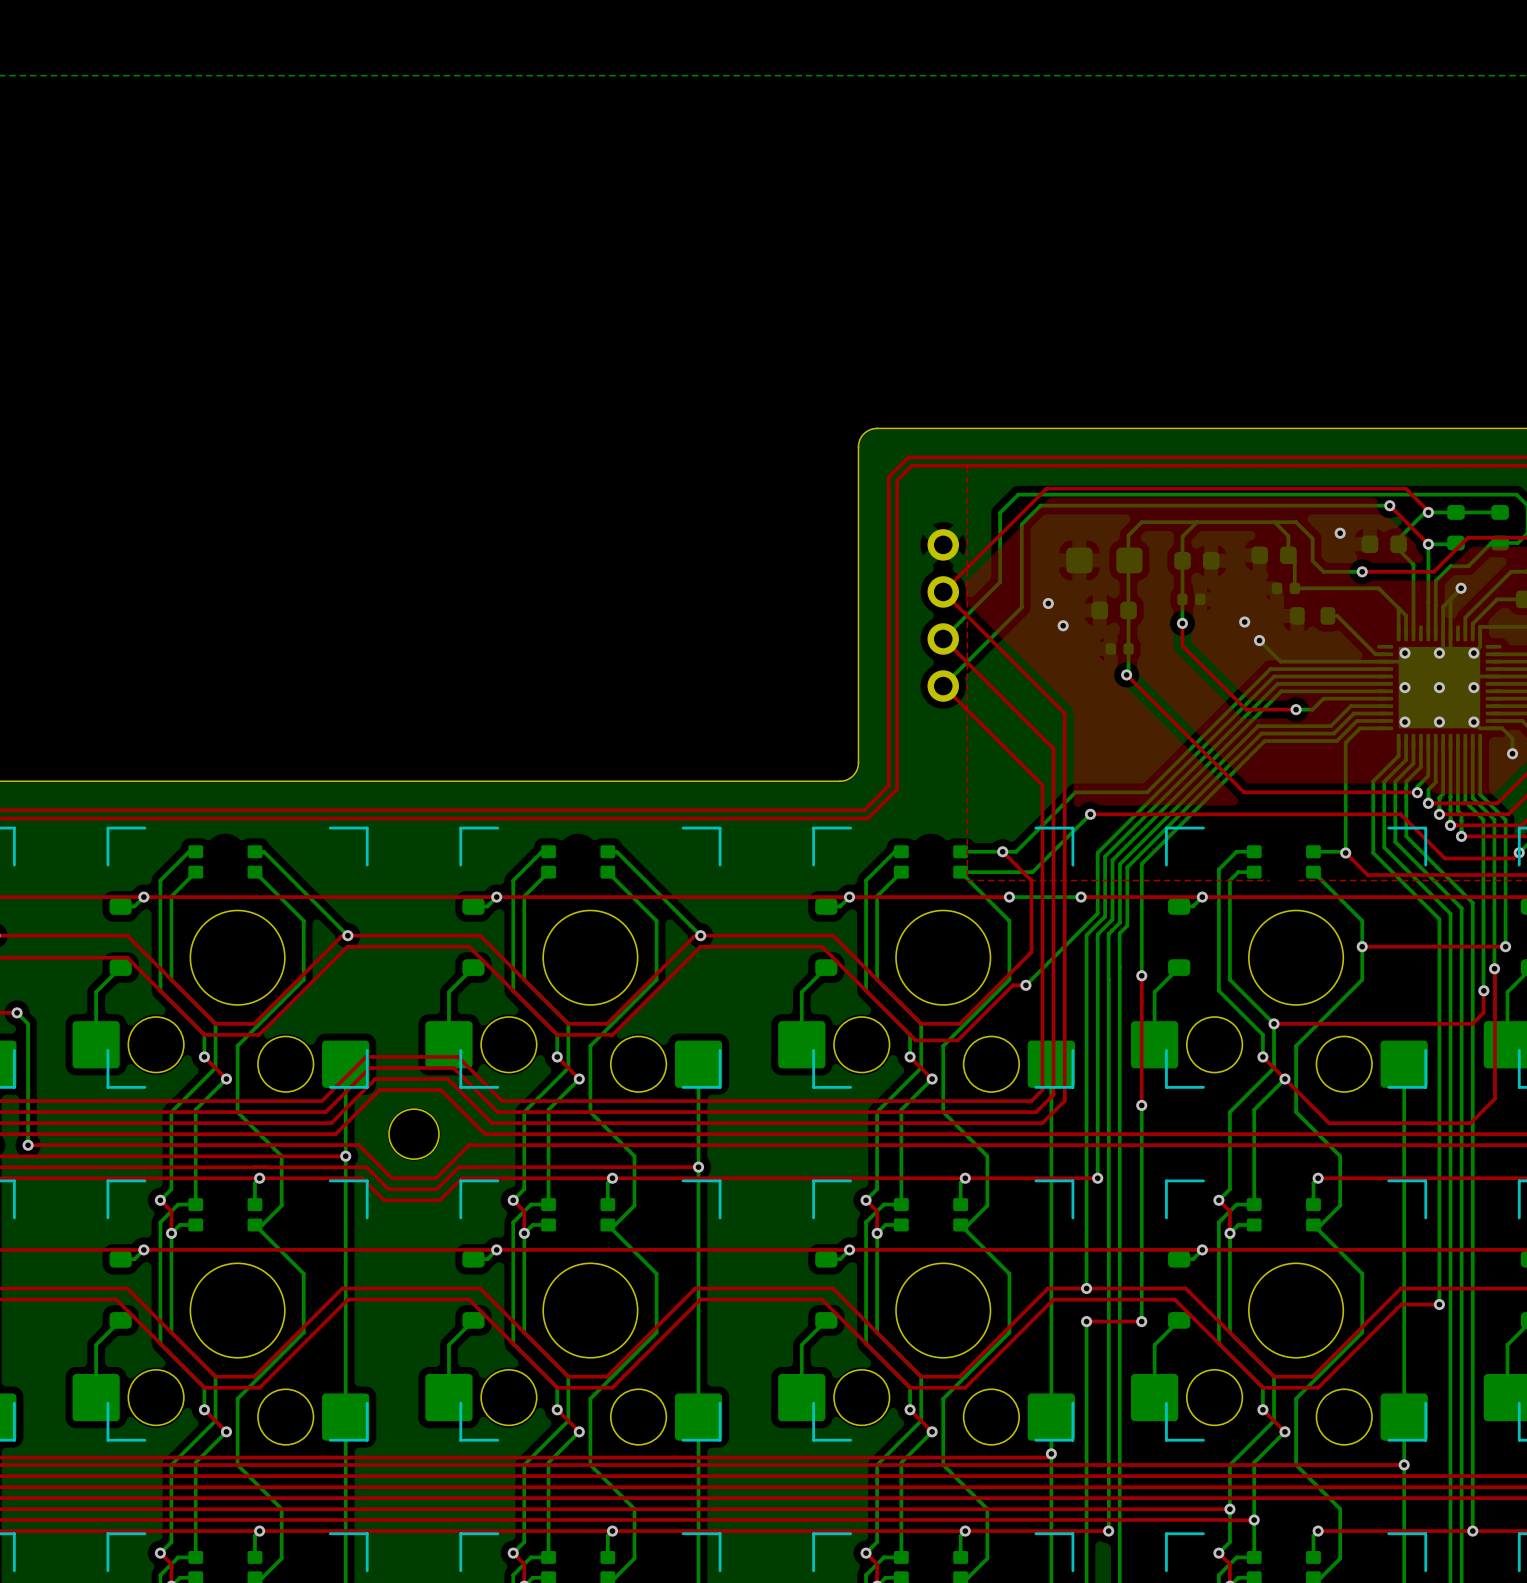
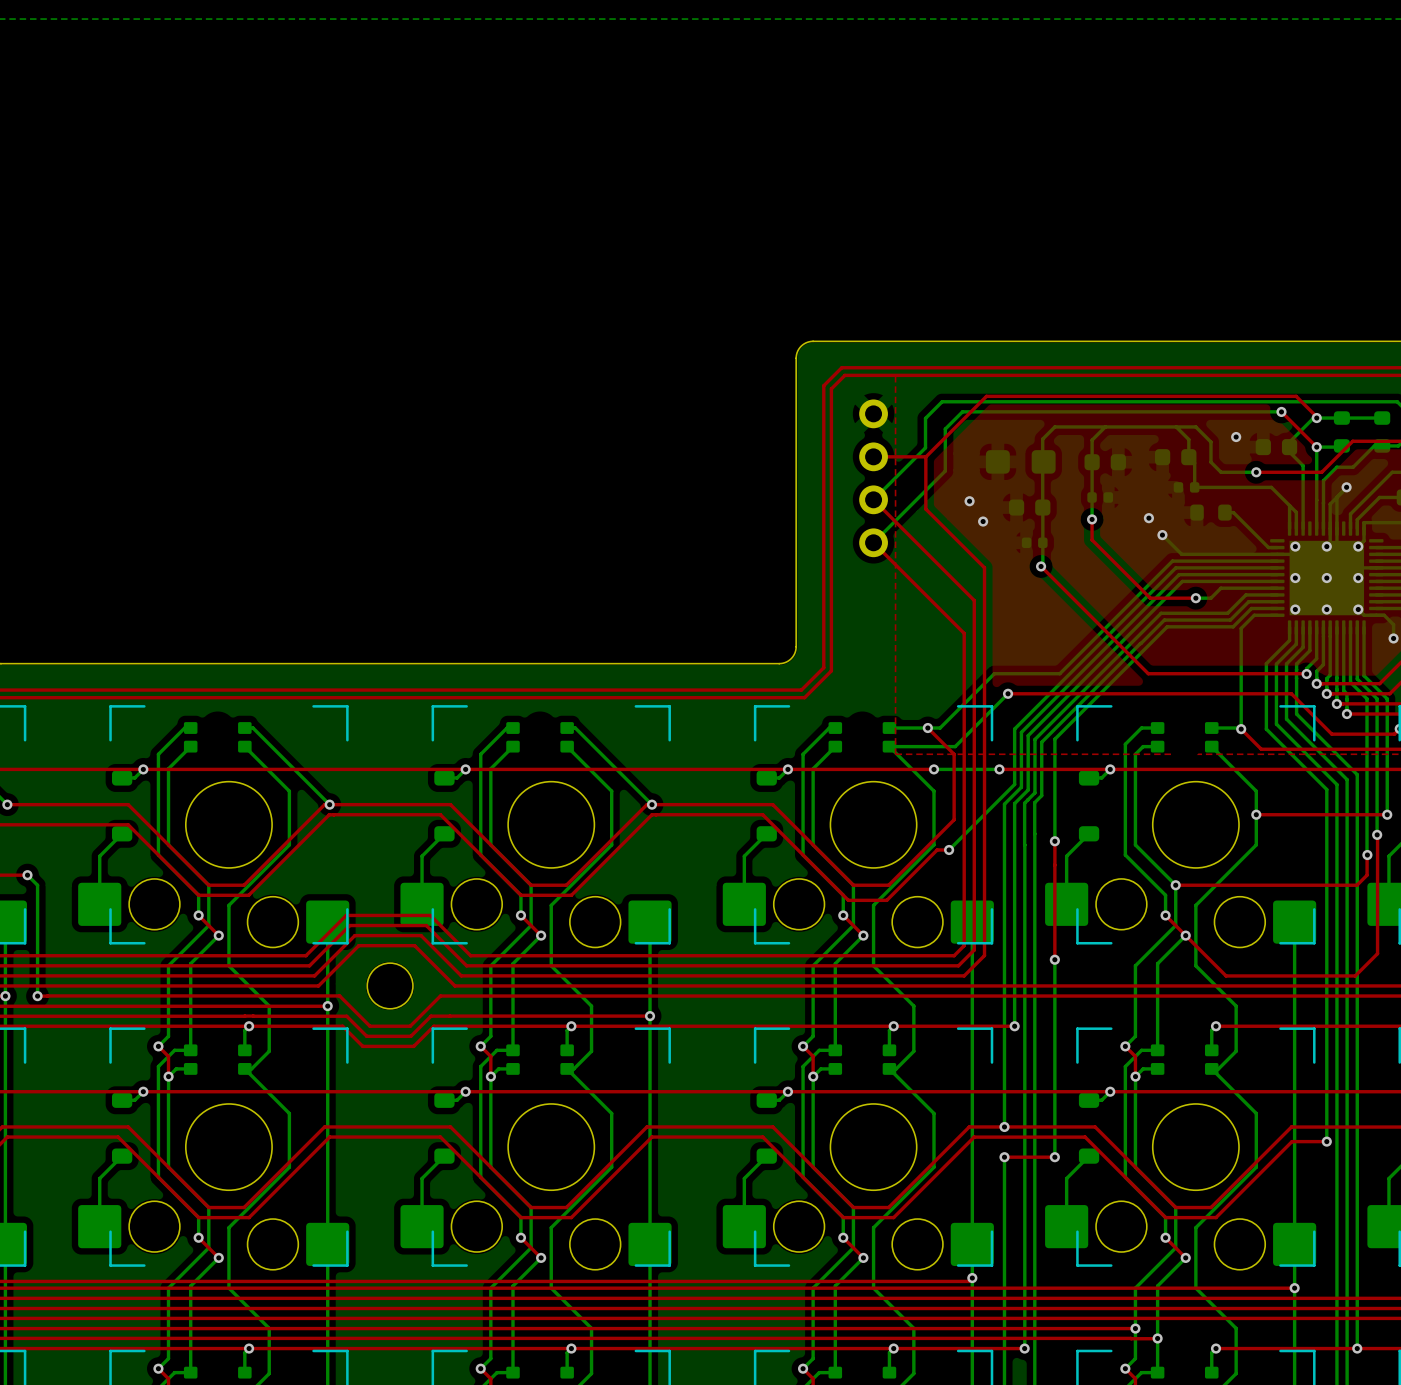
top track: (1066, 488) (1046, 488) (943, 591) (1064, 713) -> (986, 396) (925, 457) (925, 509) (984, 567) (984, 601)
bottom track: (1000, 545) (1000, 582) (943, 638) -> (925, 447) (873, 499)
top track: none -> (873, 456) (925, 456)
bottom track: (1021, 570) (1021, 607) (943, 686) -> (945, 471) (873, 542)
part position: (943, 615) -> (873, 478)
top track: (943, 638) (1053, 748) -> (873, 499) (974, 600) (974, 633)
top track: (943, 686) (1042, 785) -> (873, 542) (964, 633) (964, 667)

